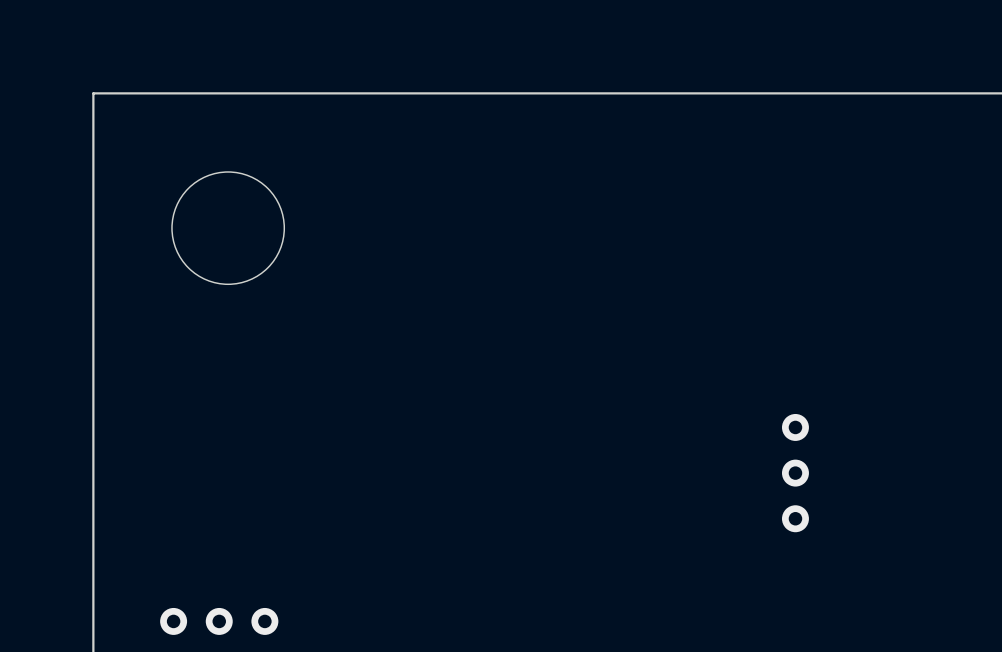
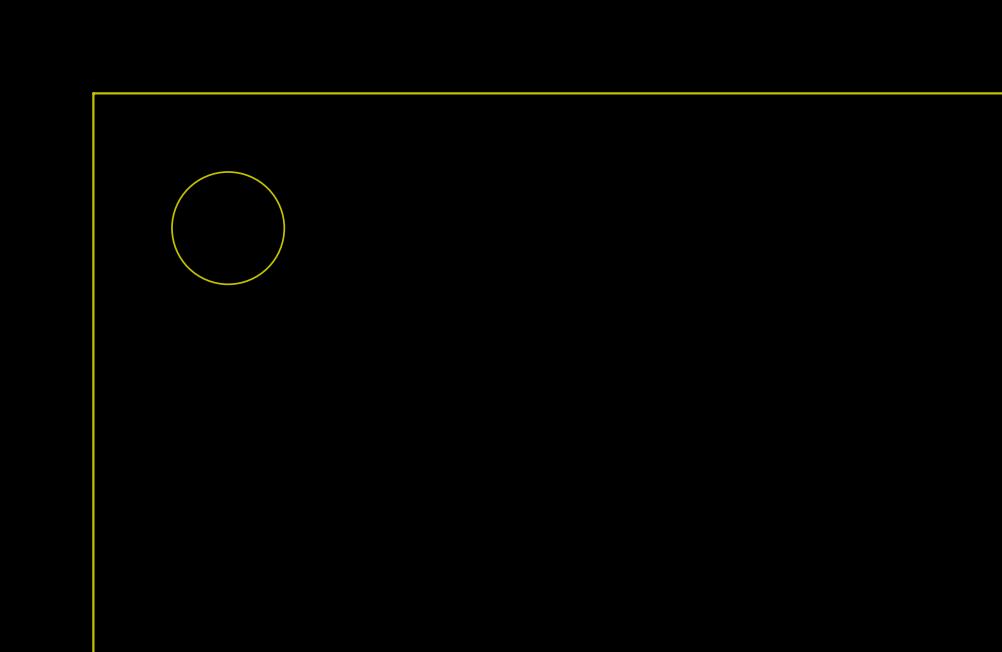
via: (795, 427) -> none
via: (795, 473) -> none
via: (795, 518) -> none
via: (173, 621) -> none
via: (219, 621) -> none
via: (264, 621) -> none

